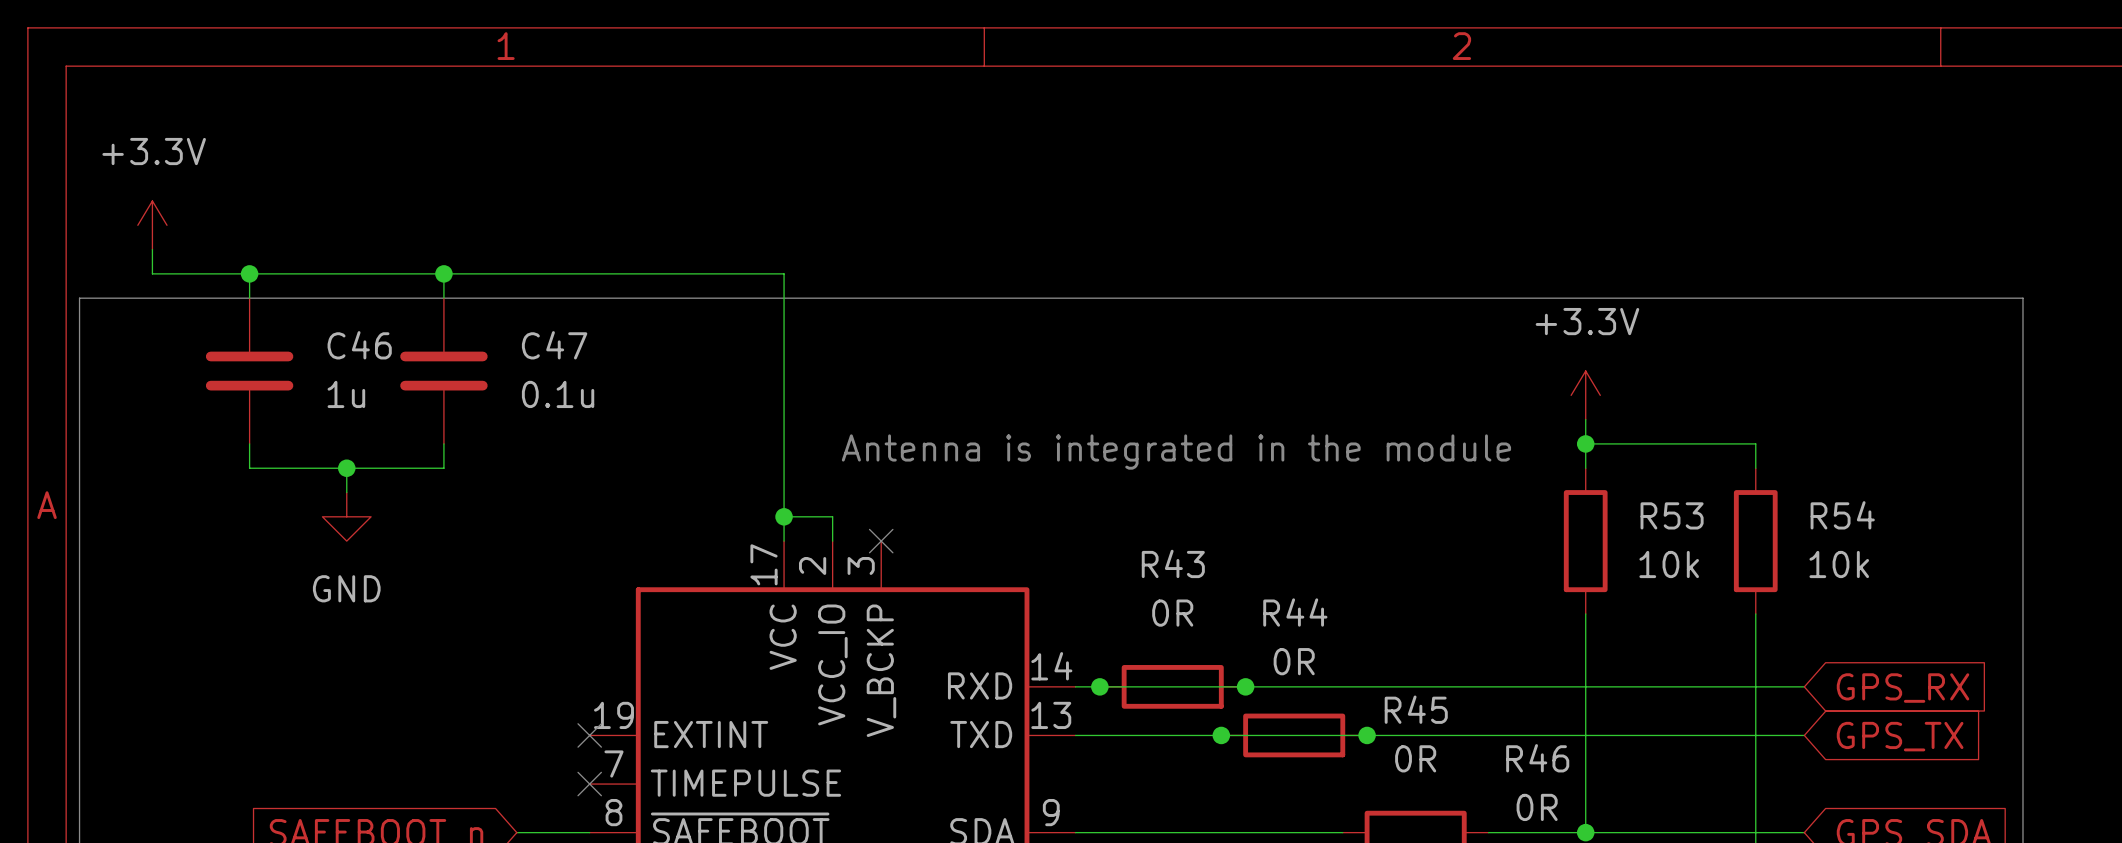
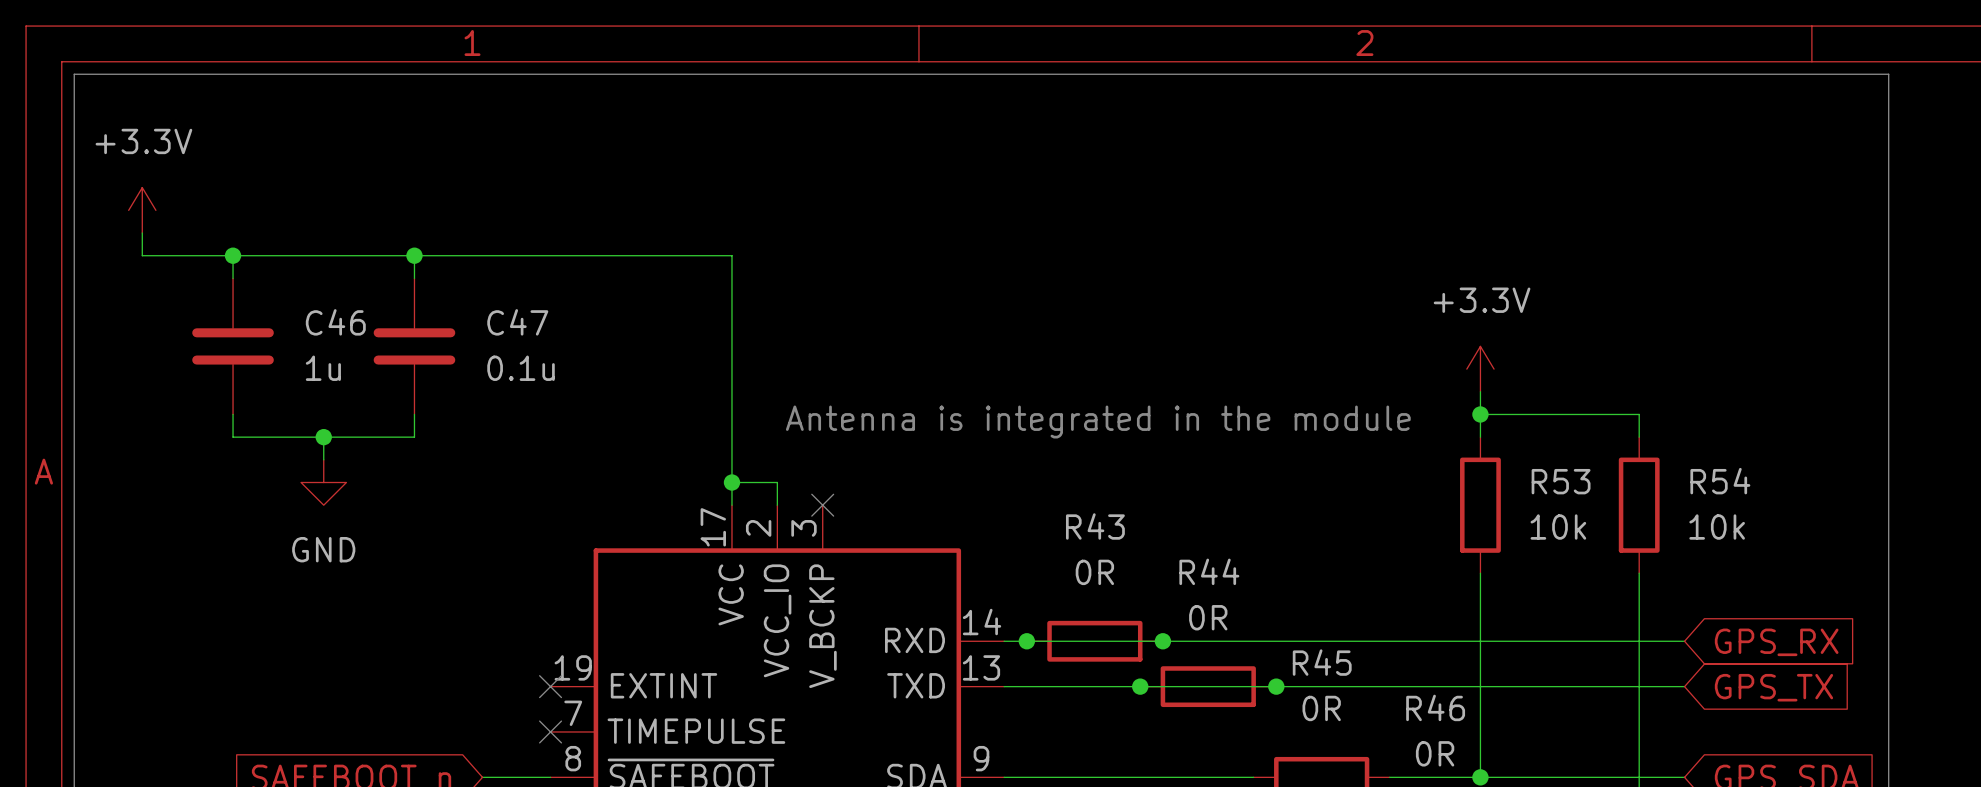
line: (79, 298) (2022, 298) -> (74, 278) (74, 74) (1888, 74) (1888, 278)

